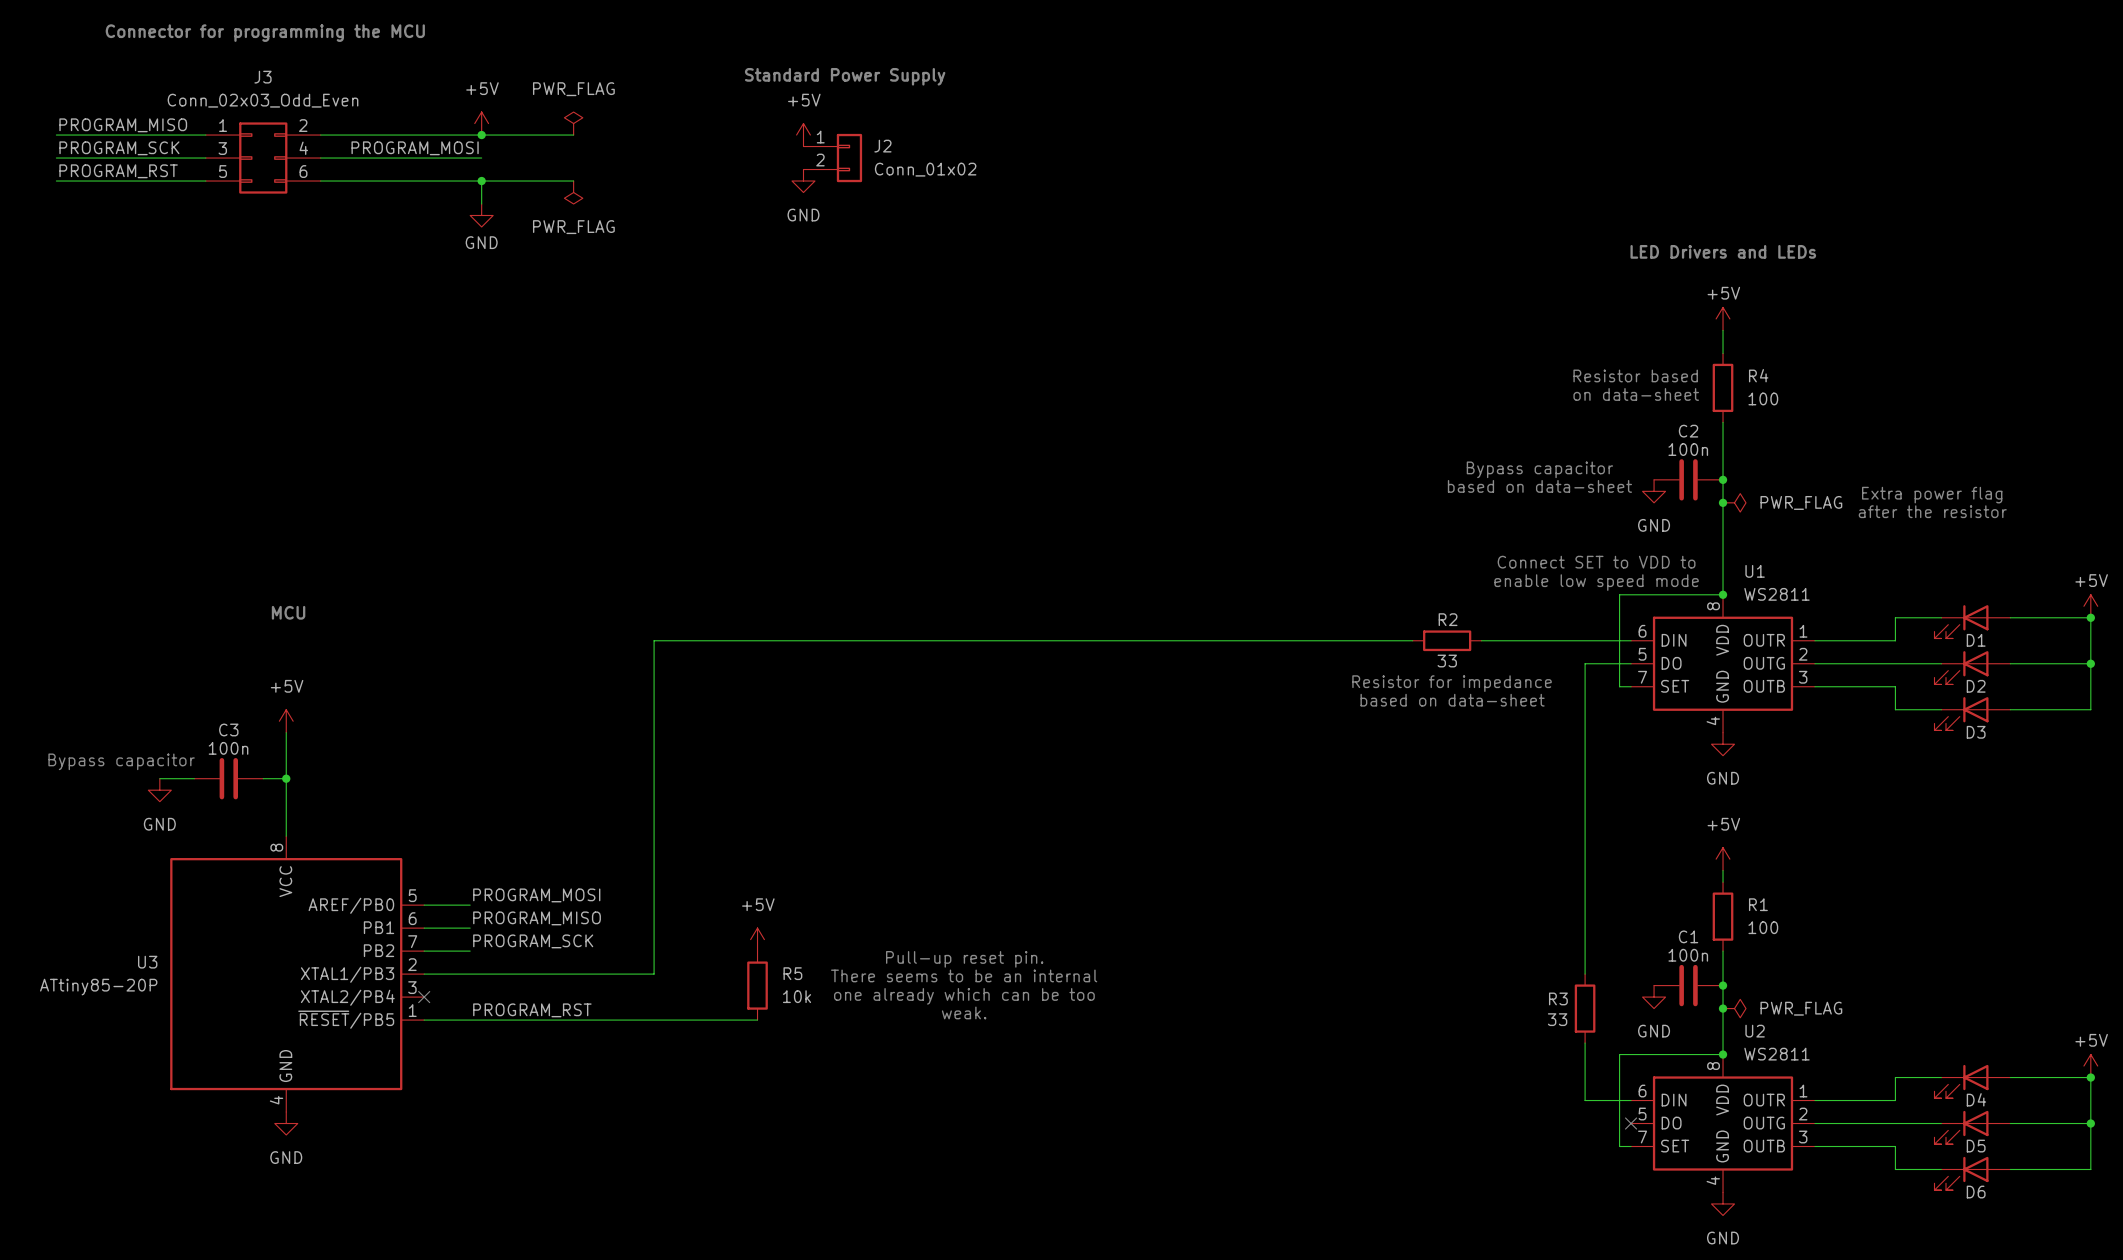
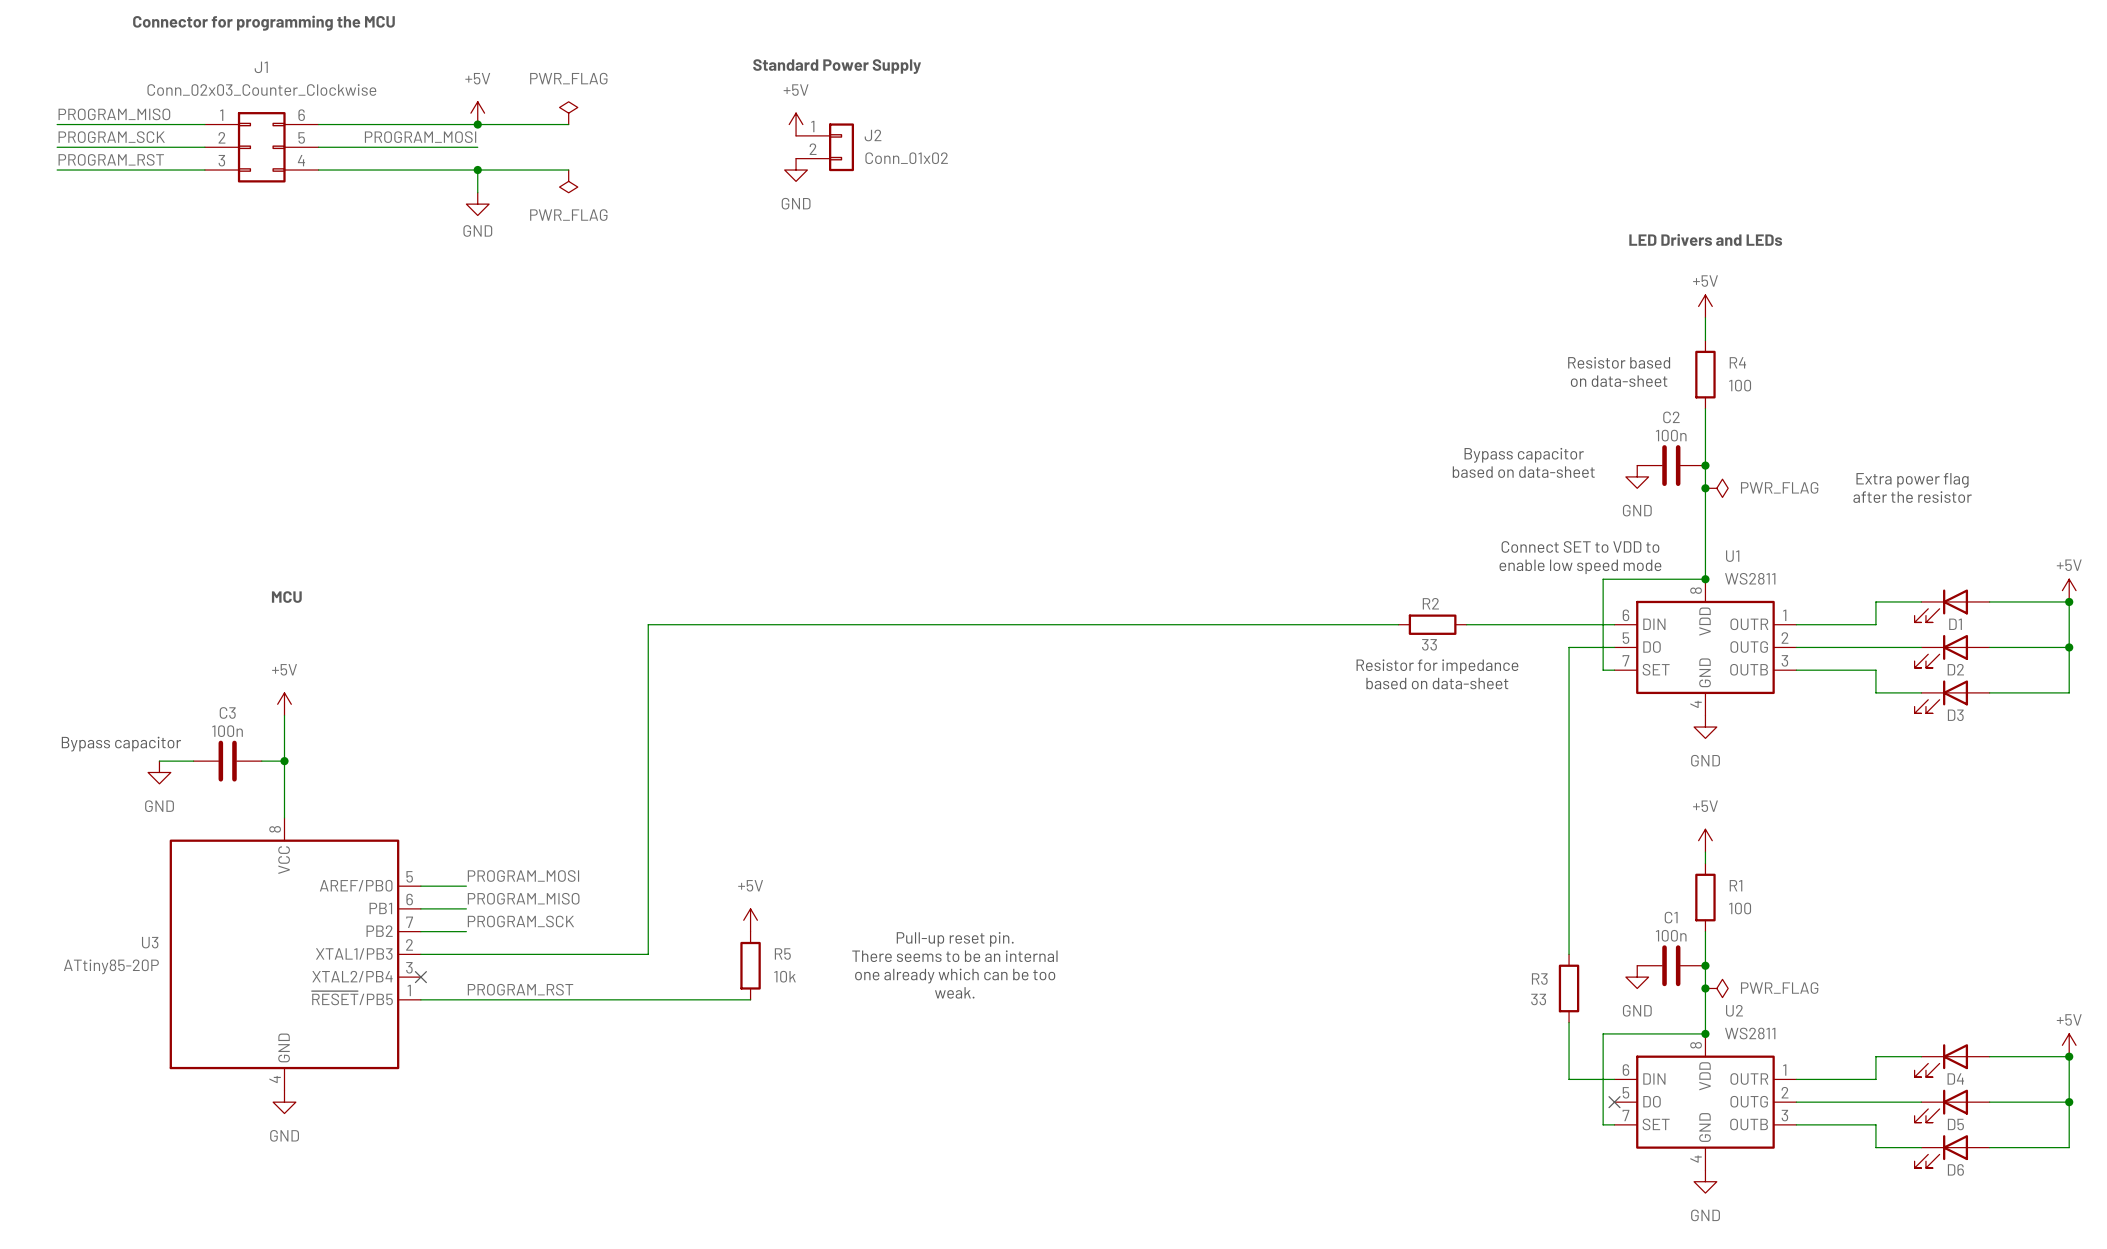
J3 name: J3 (263, 77) -> J1 (261, 67)
J3 value: Conn_02x03_Odd_Even (263, 100) -> Conn_02x03_Counter_Clockwise (261, 90)
J3 pin number: 2 (303, 125) -> 6 (301, 115)
J3 pin number: 3 (222, 148) -> 2 (221, 137)
J3 pin number: 4 (303, 148) -> 5 (301, 137)
J3 pin number: 5 (223, 171) -> 3 (221, 160)
J3 pin number: 6 (303, 171) -> 4 (301, 160)

